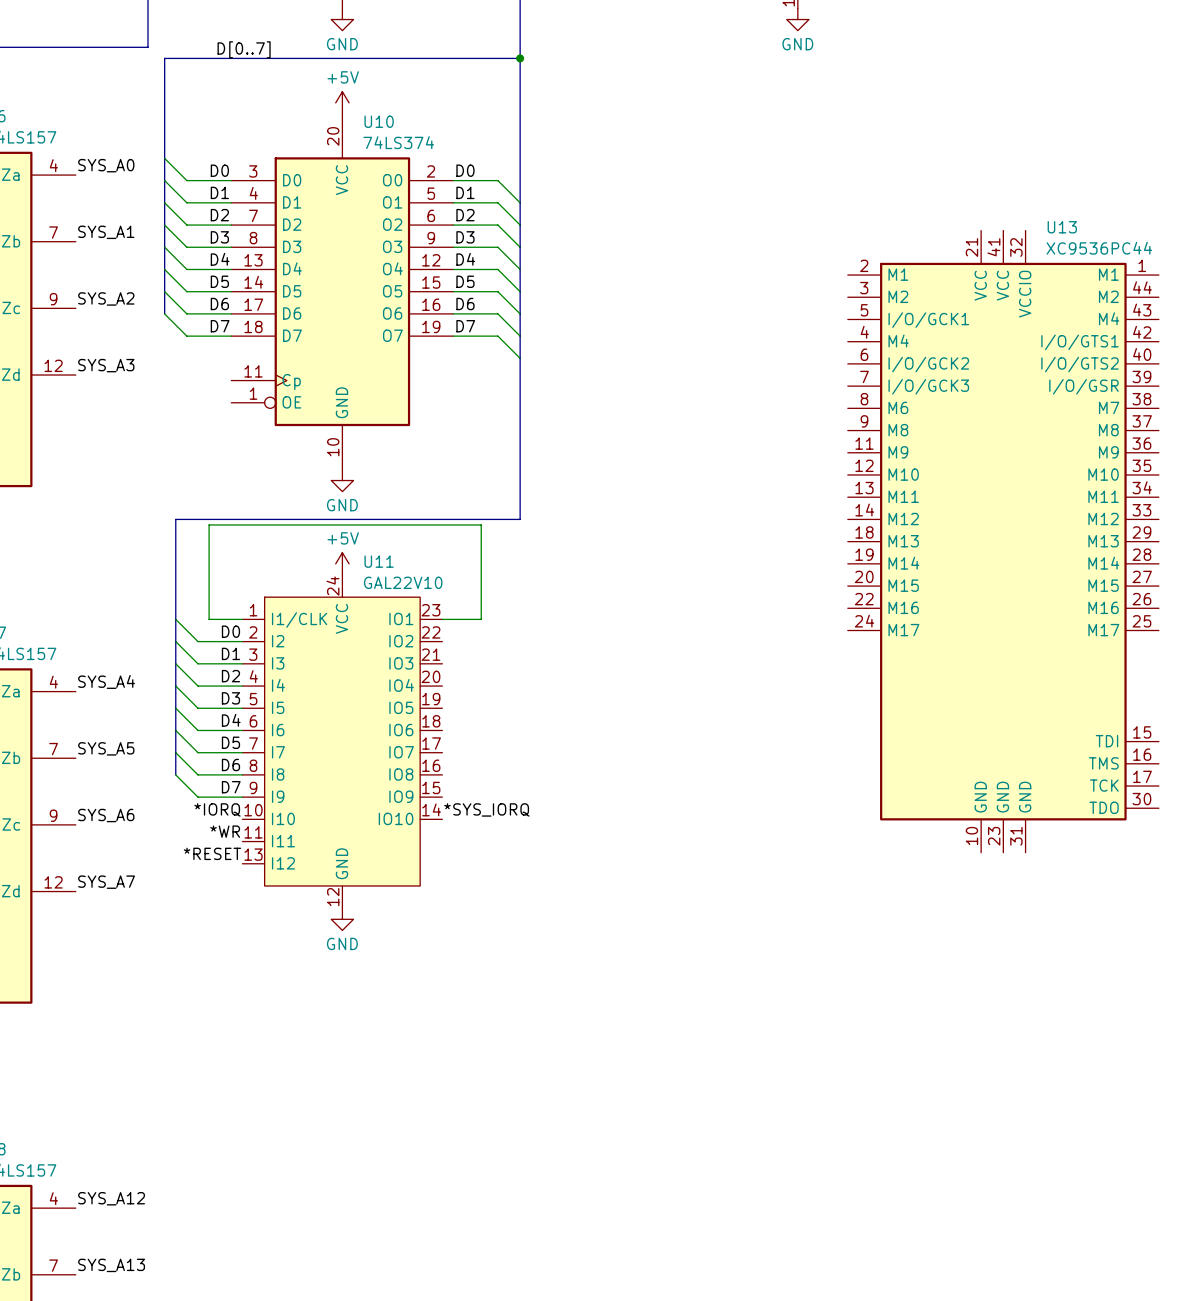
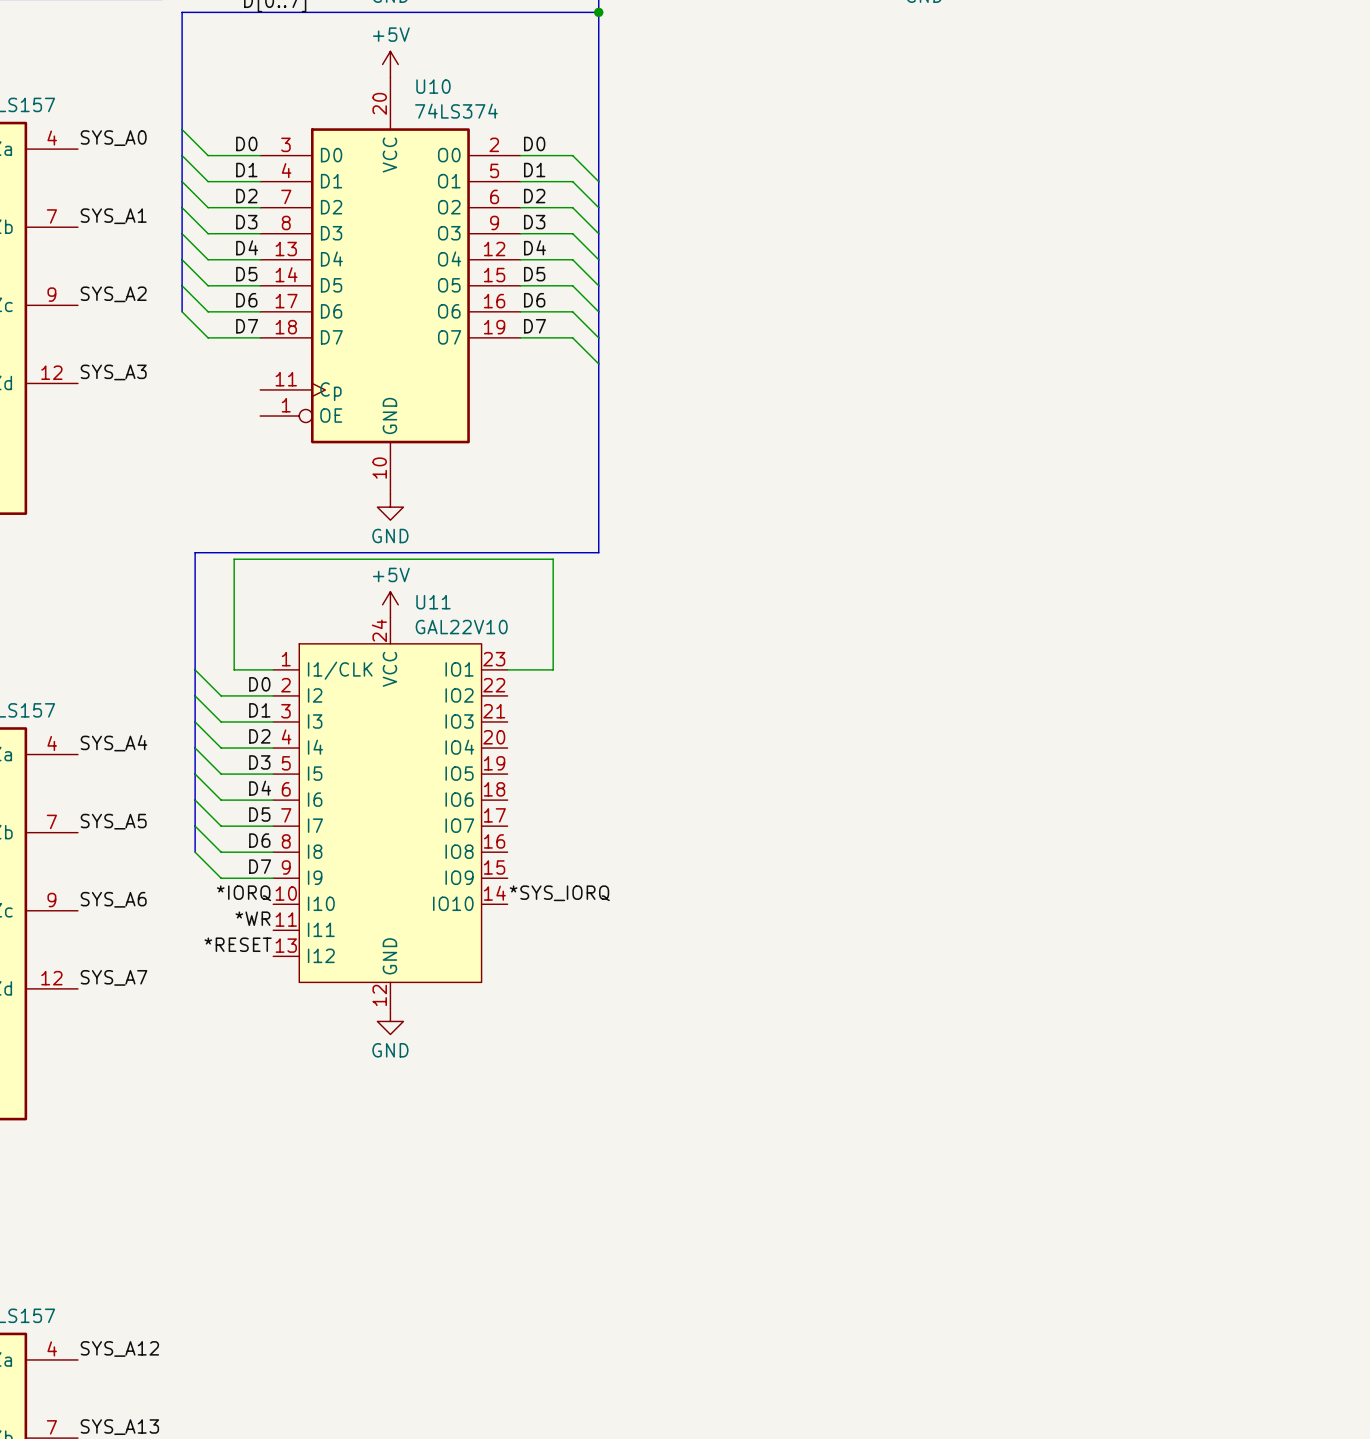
U13: XC9536PC44 (1003, 541) -> none

